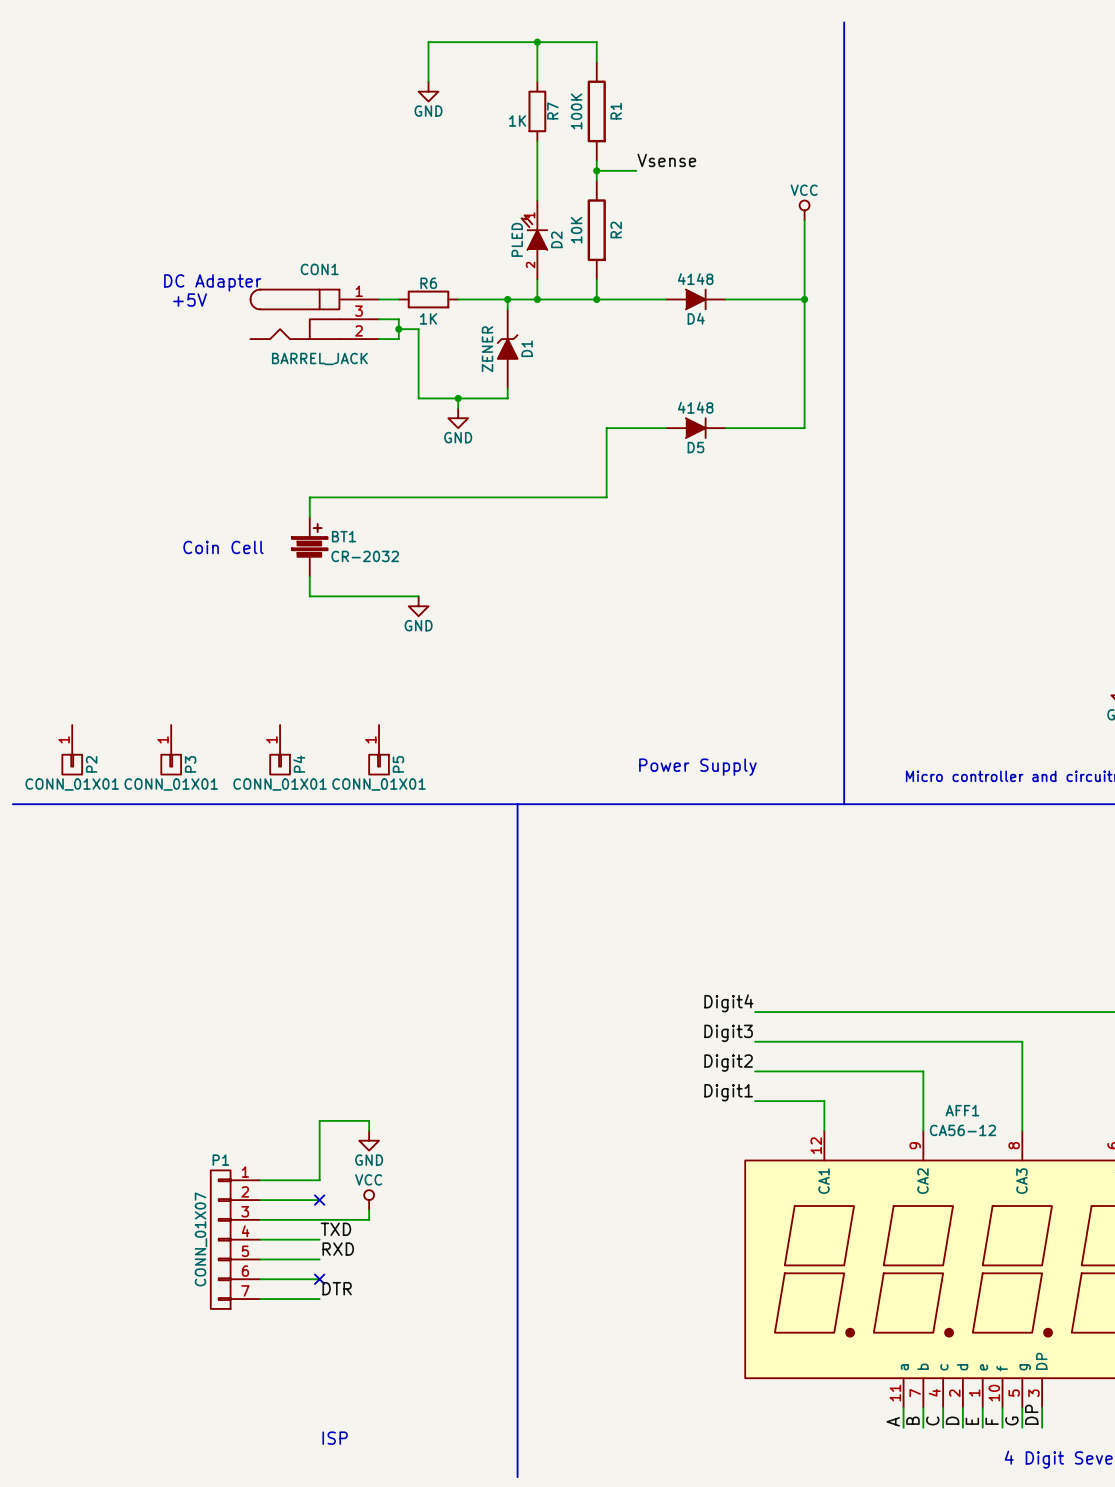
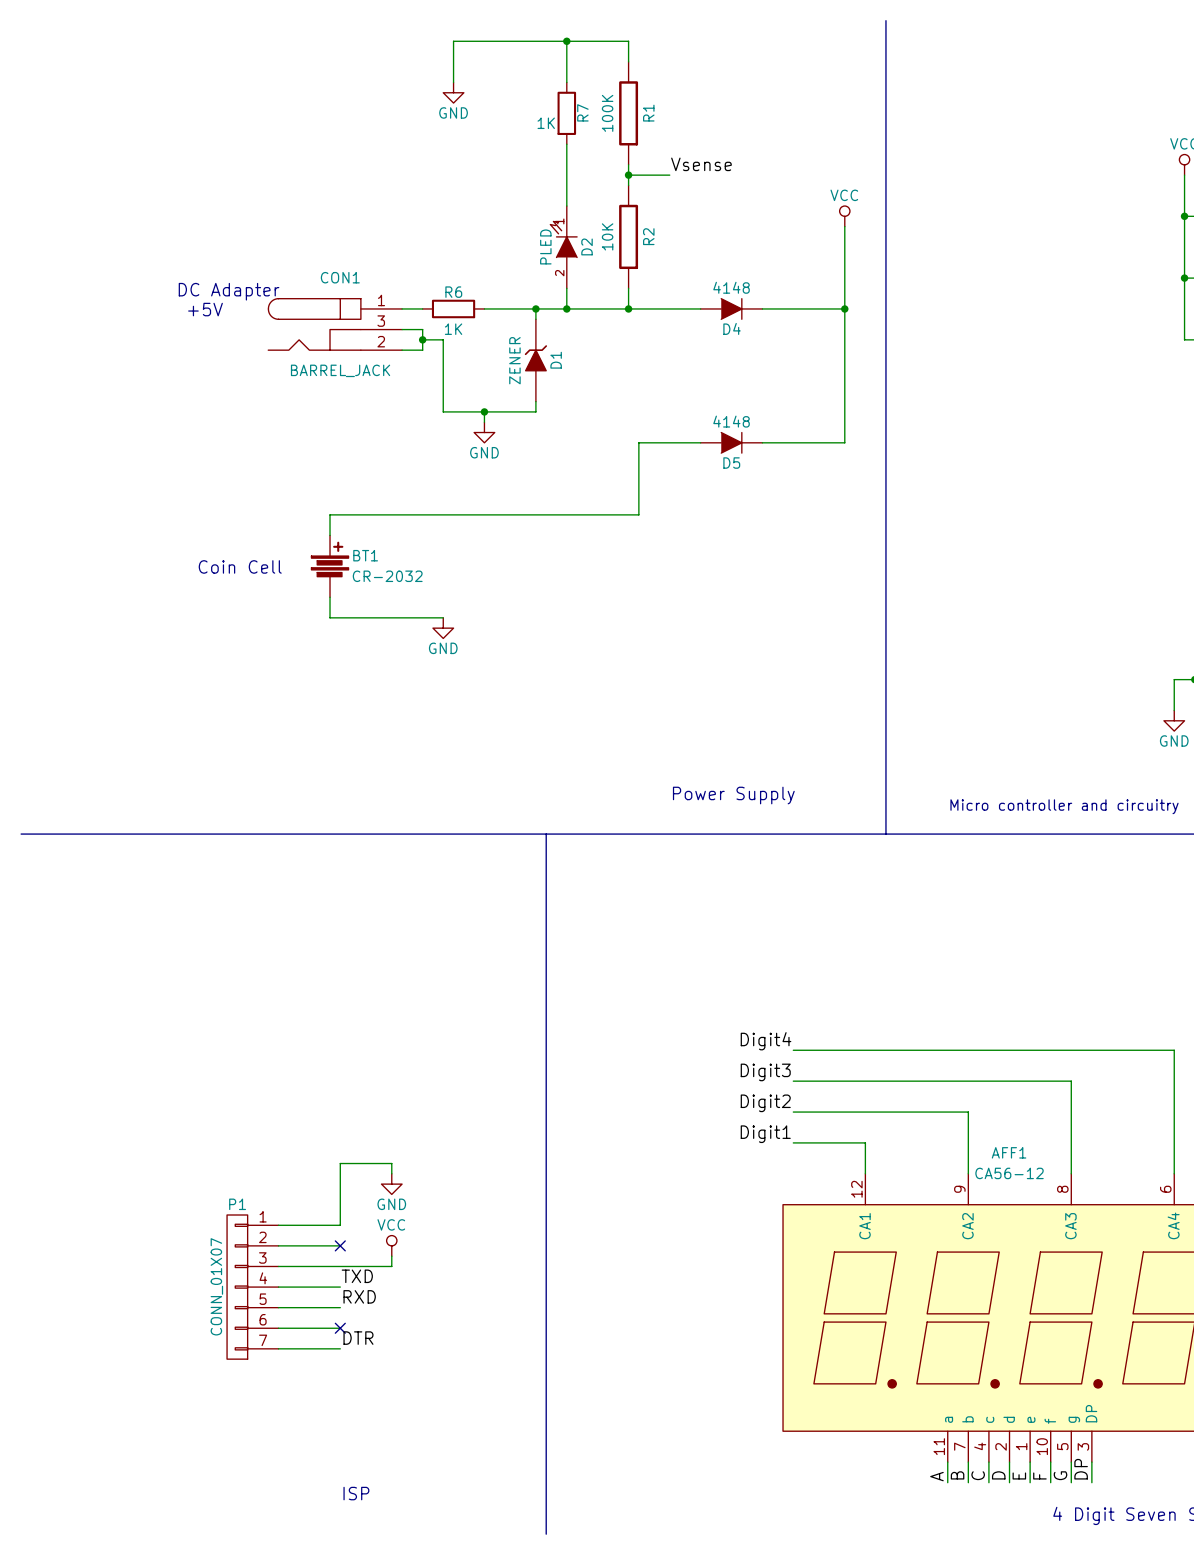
P2: CONN_01X01 (72, 749) -> none
P3: CONN_01X01 (171, 749) -> none
P4: CONN_01X01 (280, 749) -> none
P5: CONN_01X01 (379, 749) -> none

